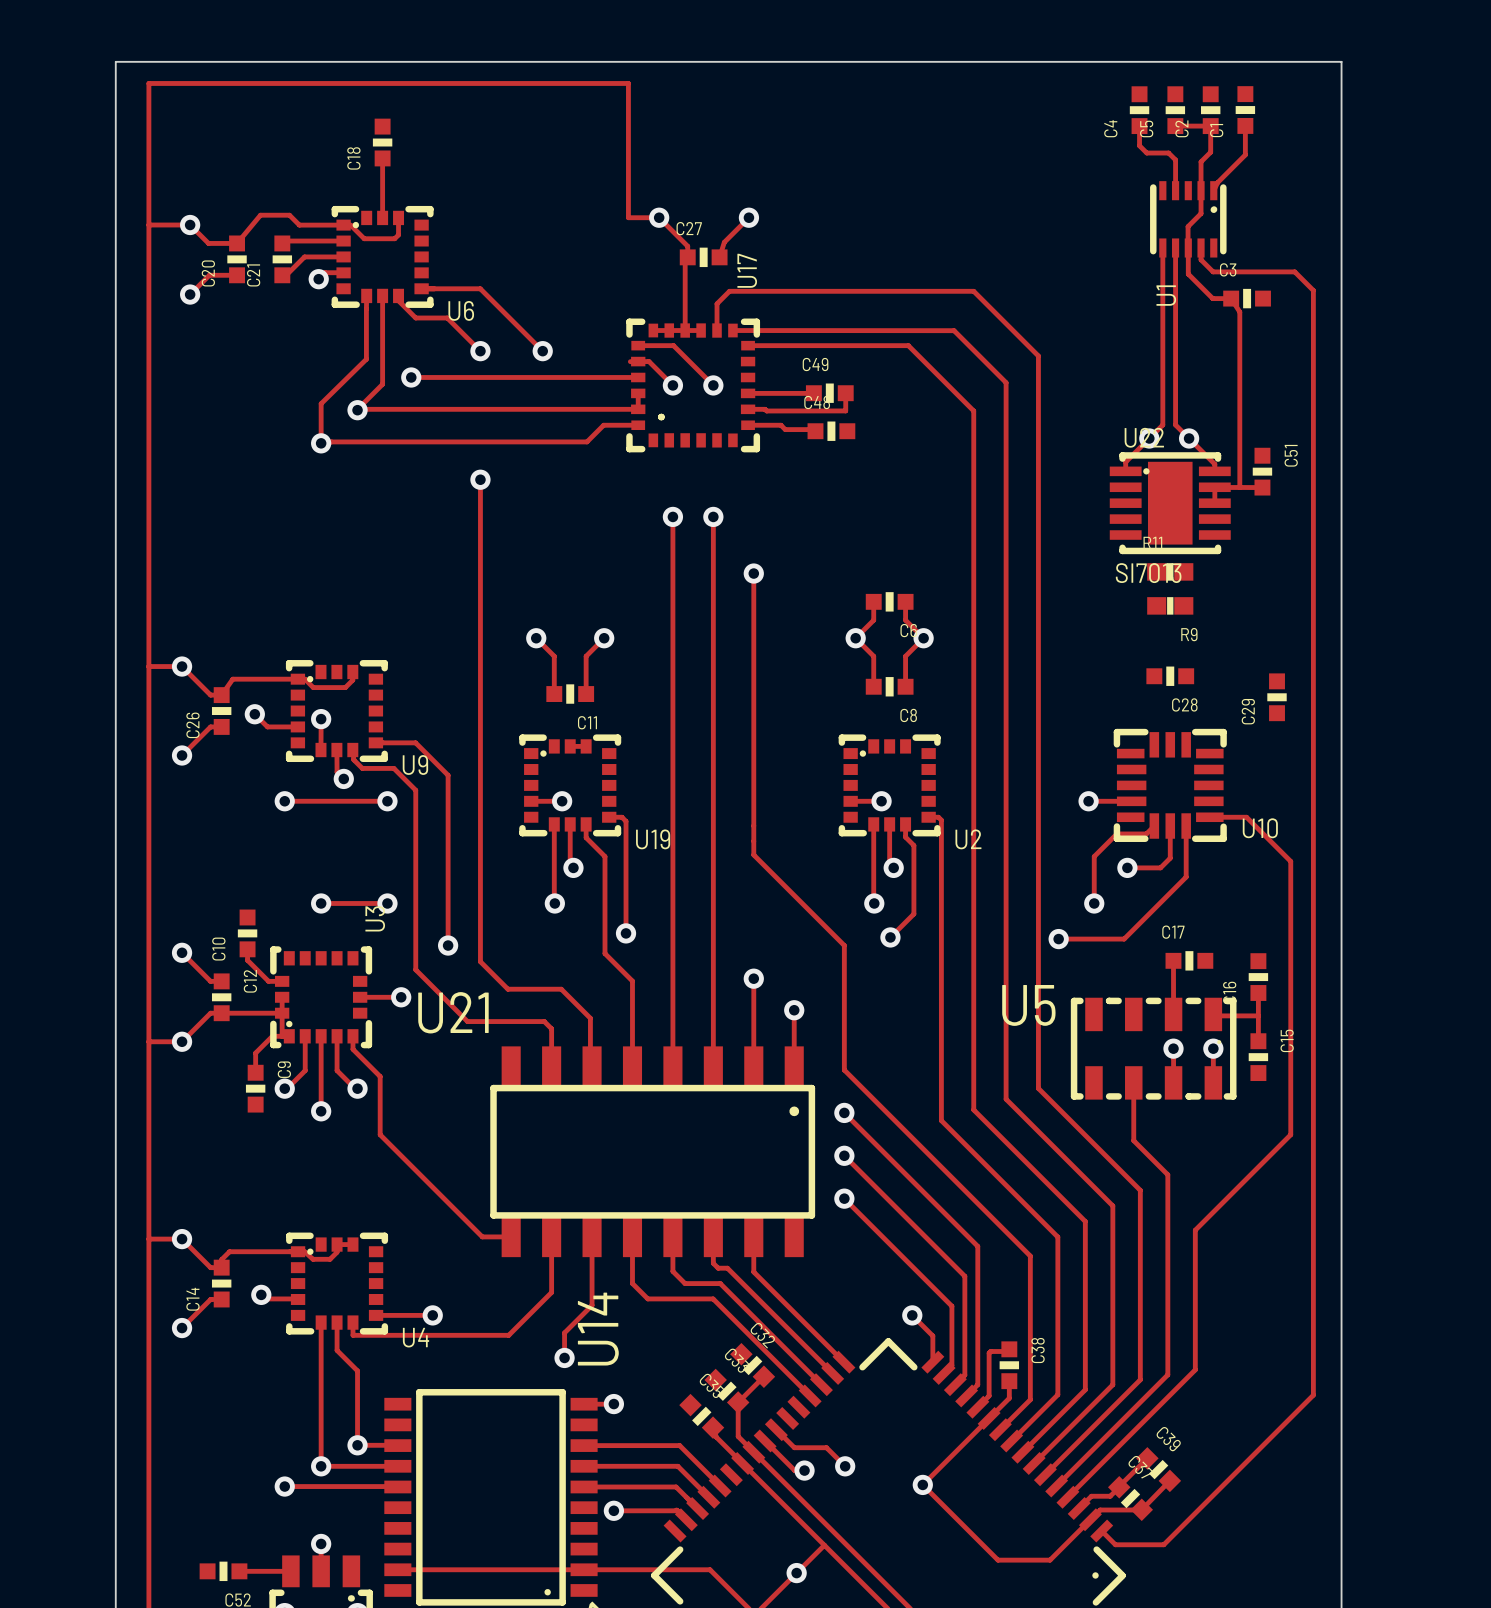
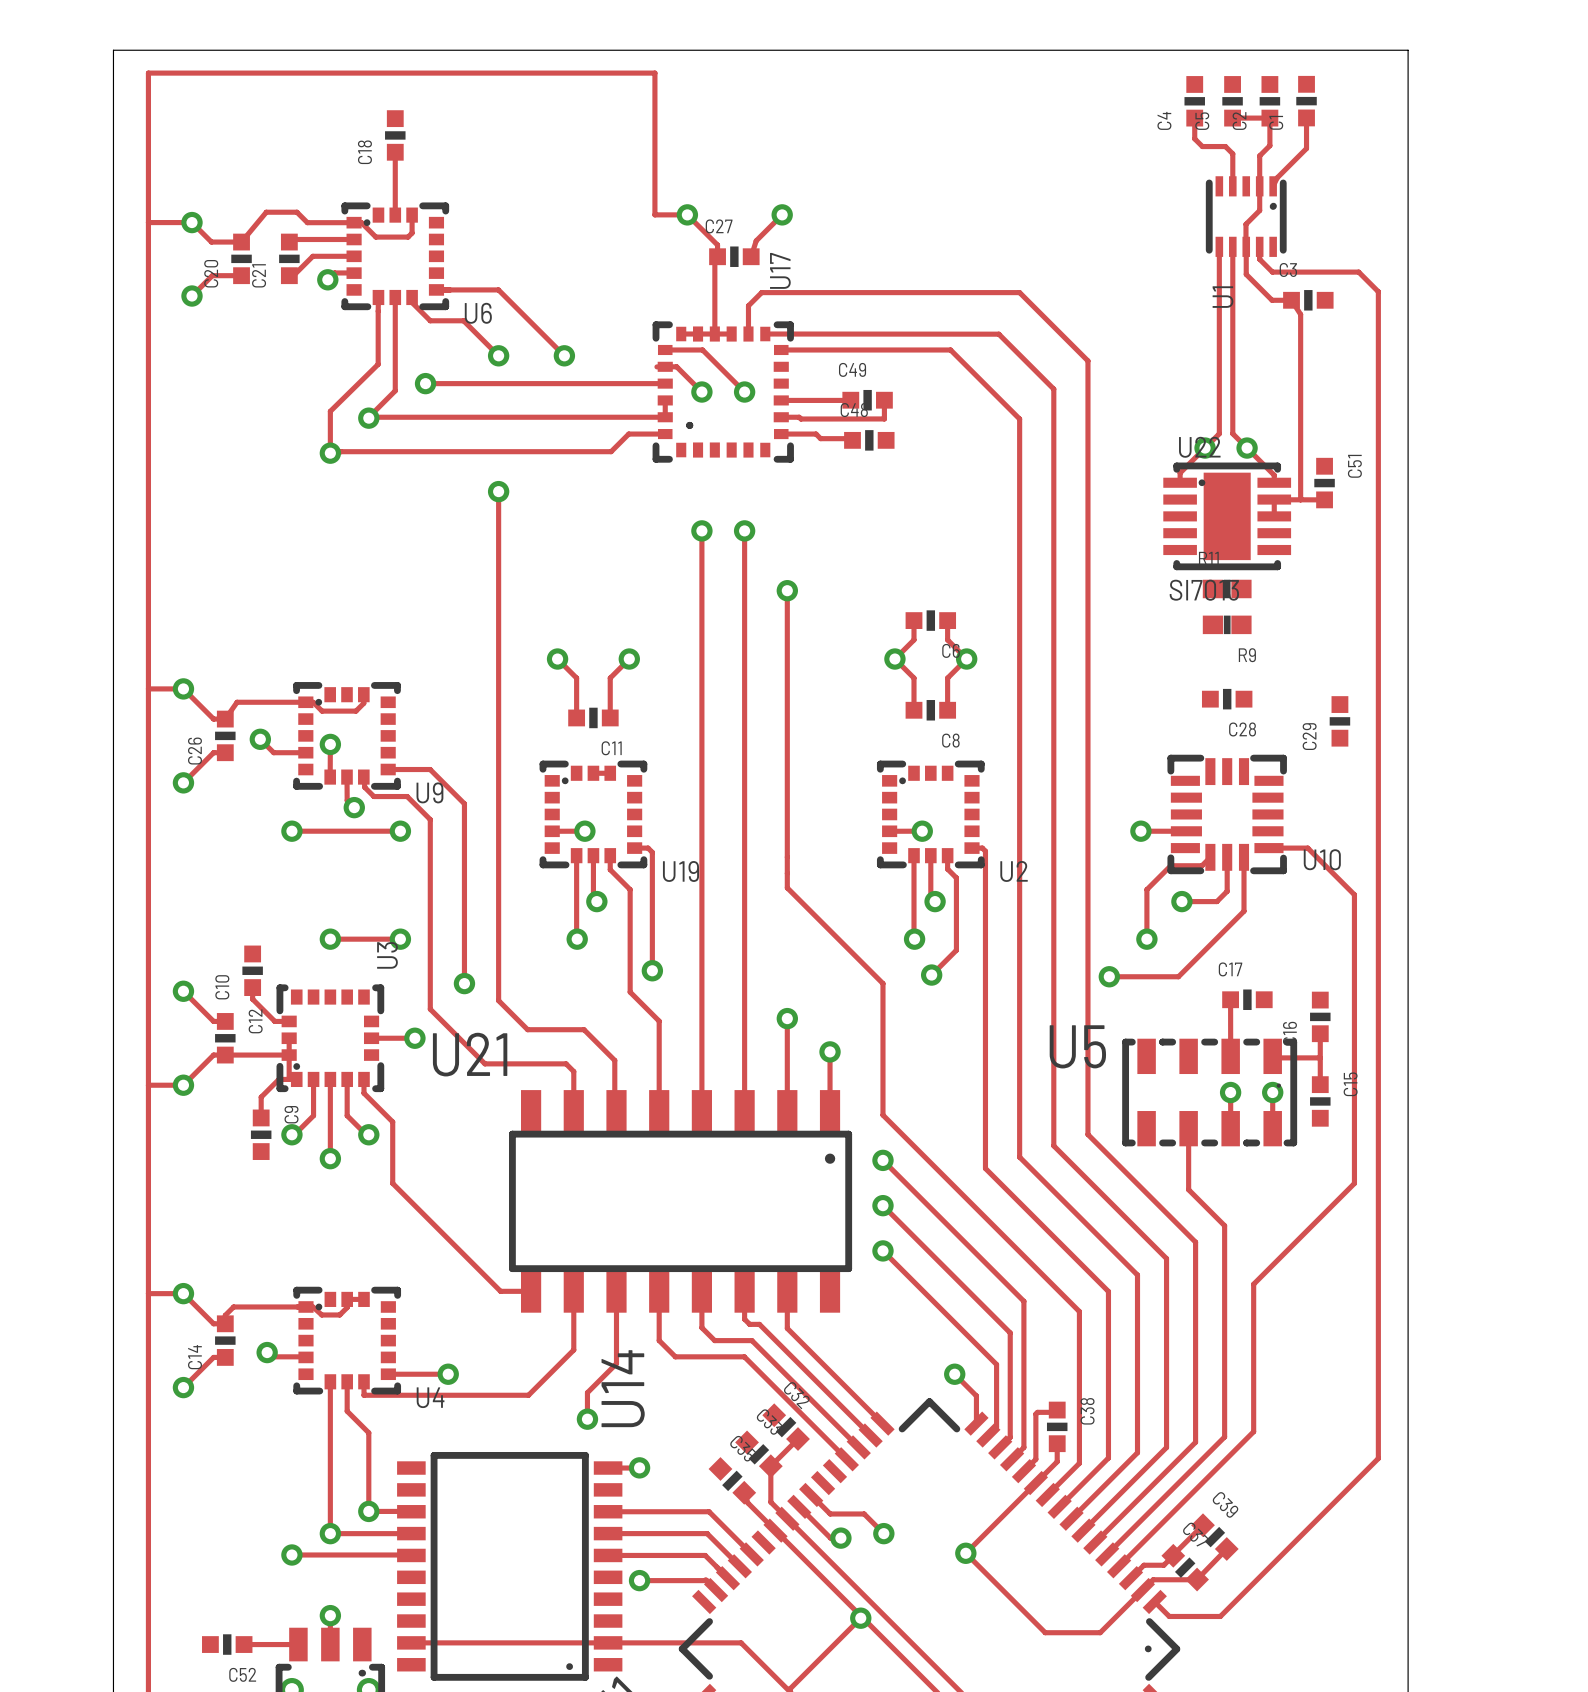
via position: (796, 1573) -> (860, 1618)

